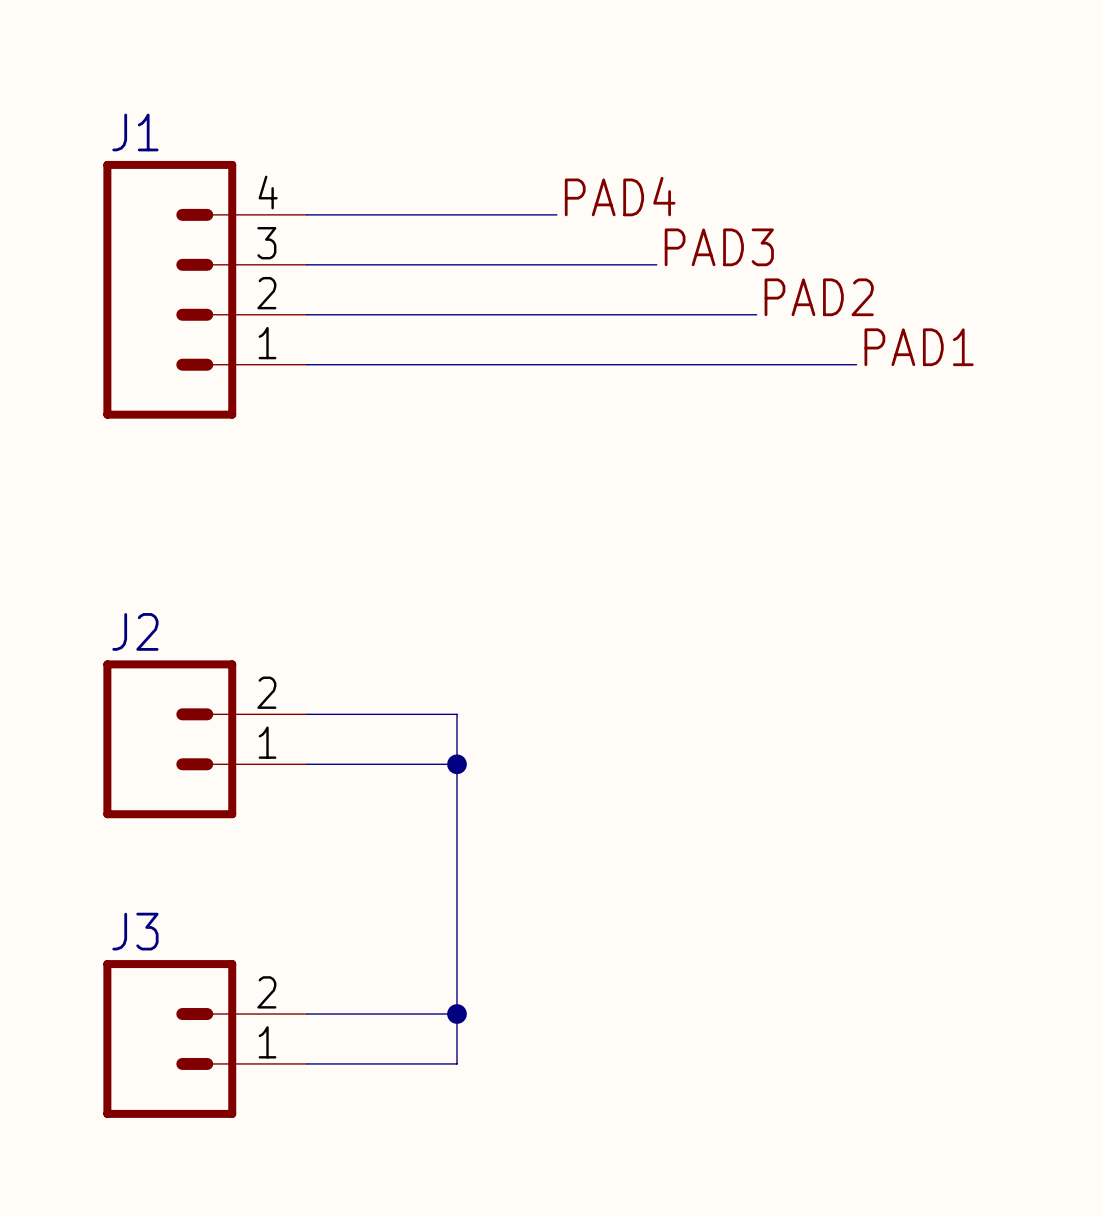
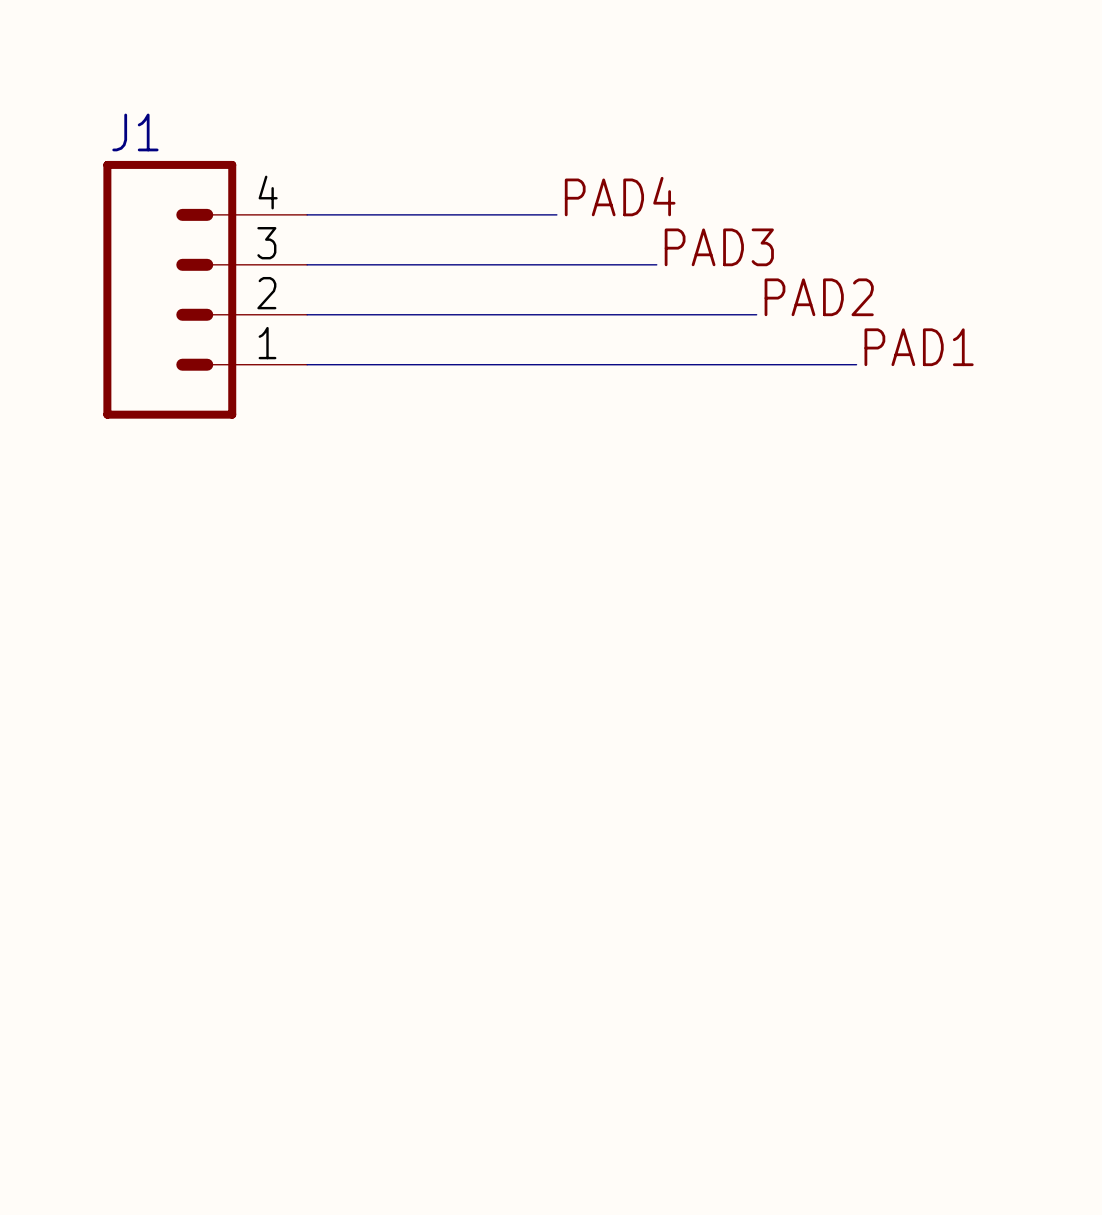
wire: (307, 714) (456, 714) (456, 1063) (307, 1063) -> none
J2: (205, 739) -> none
wire: (307, 764) (456, 764) -> none
junction: (456, 764) -> none
wire: (307, 1014) (456, 1014) -> none
junction: (456, 1014) -> none
J3: (205, 1038) -> none

